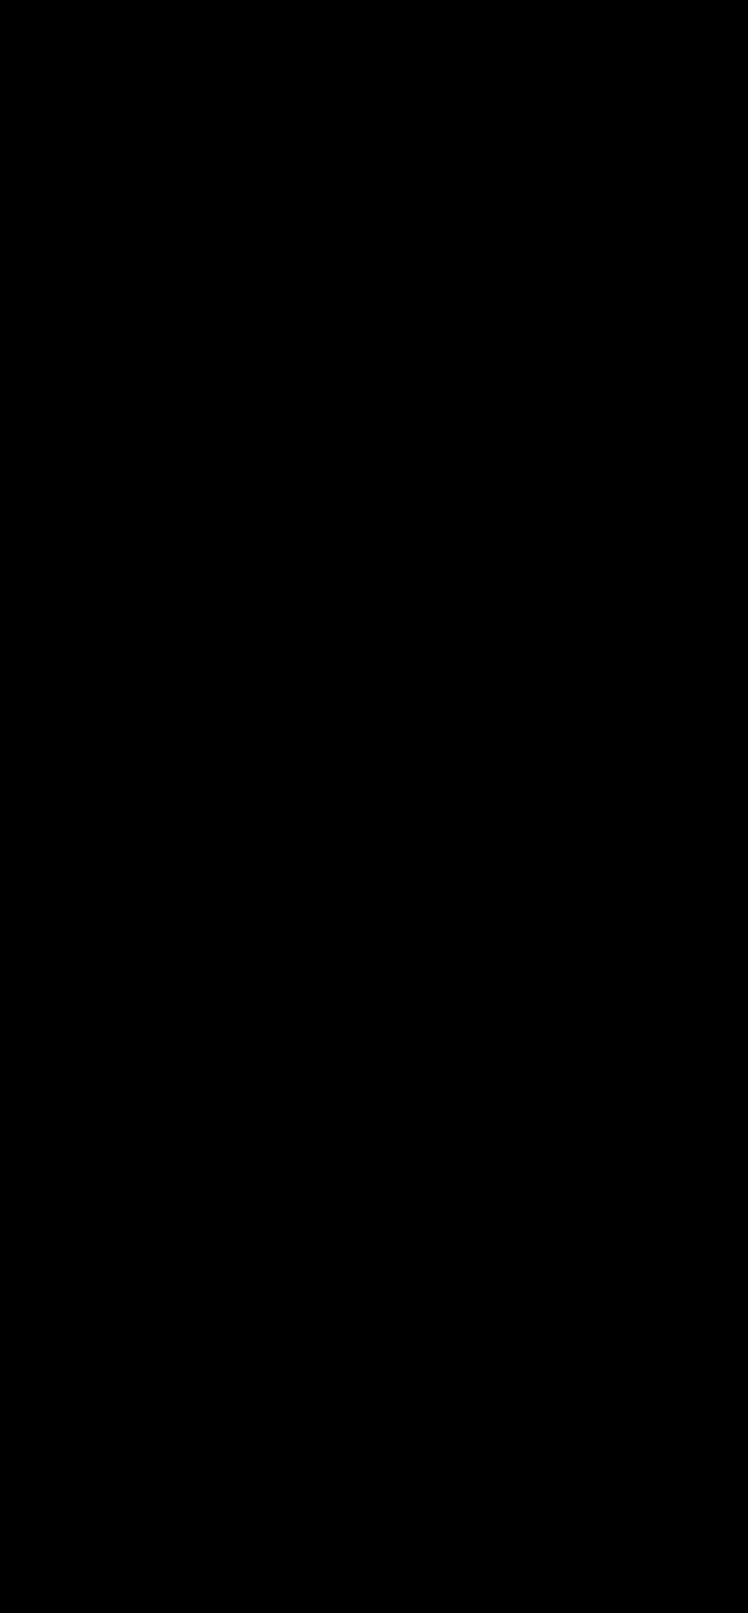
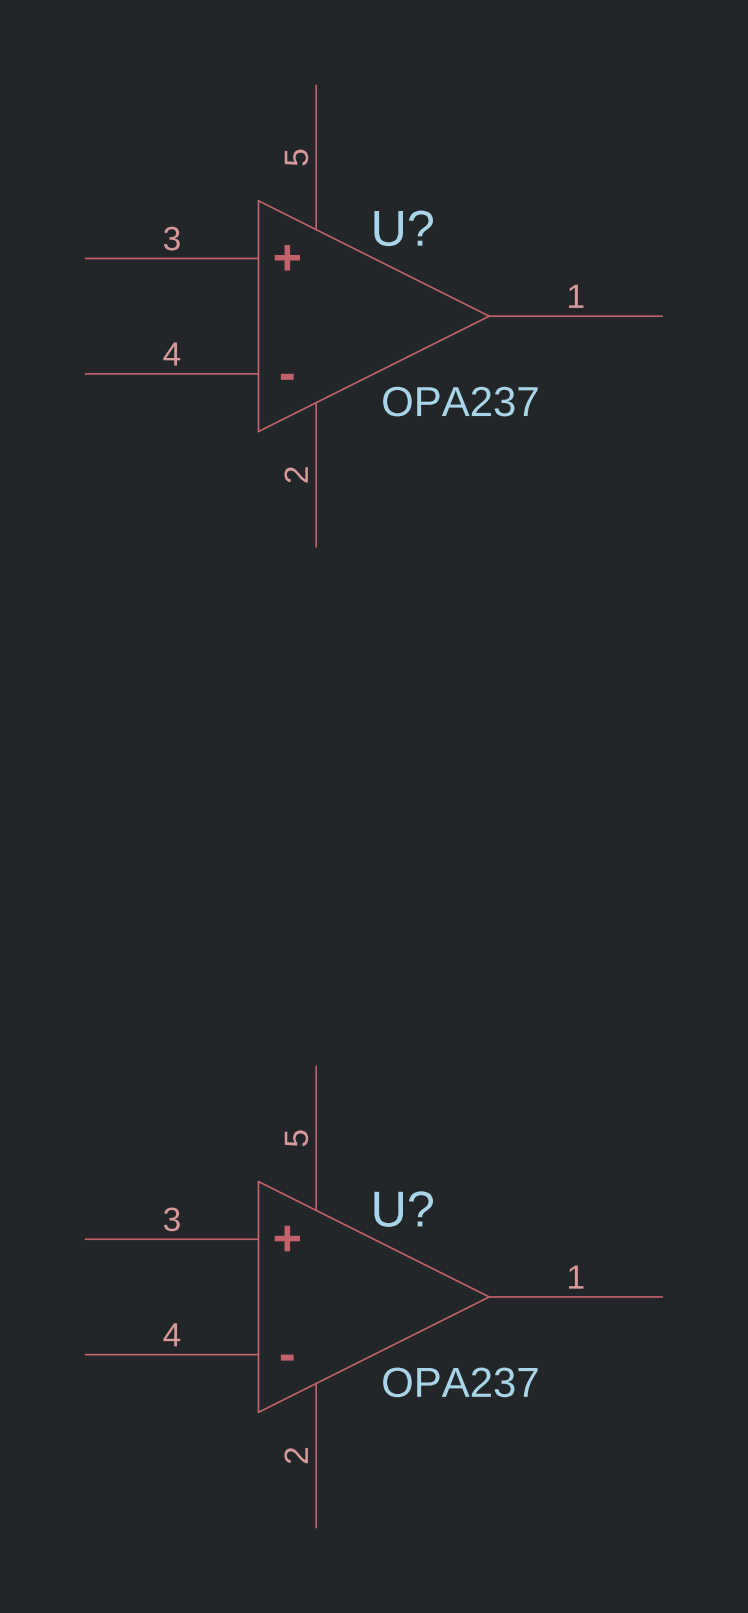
U?: none -> OPA237 (373, 316)
U?: none -> OPA237 (373, 1296)

